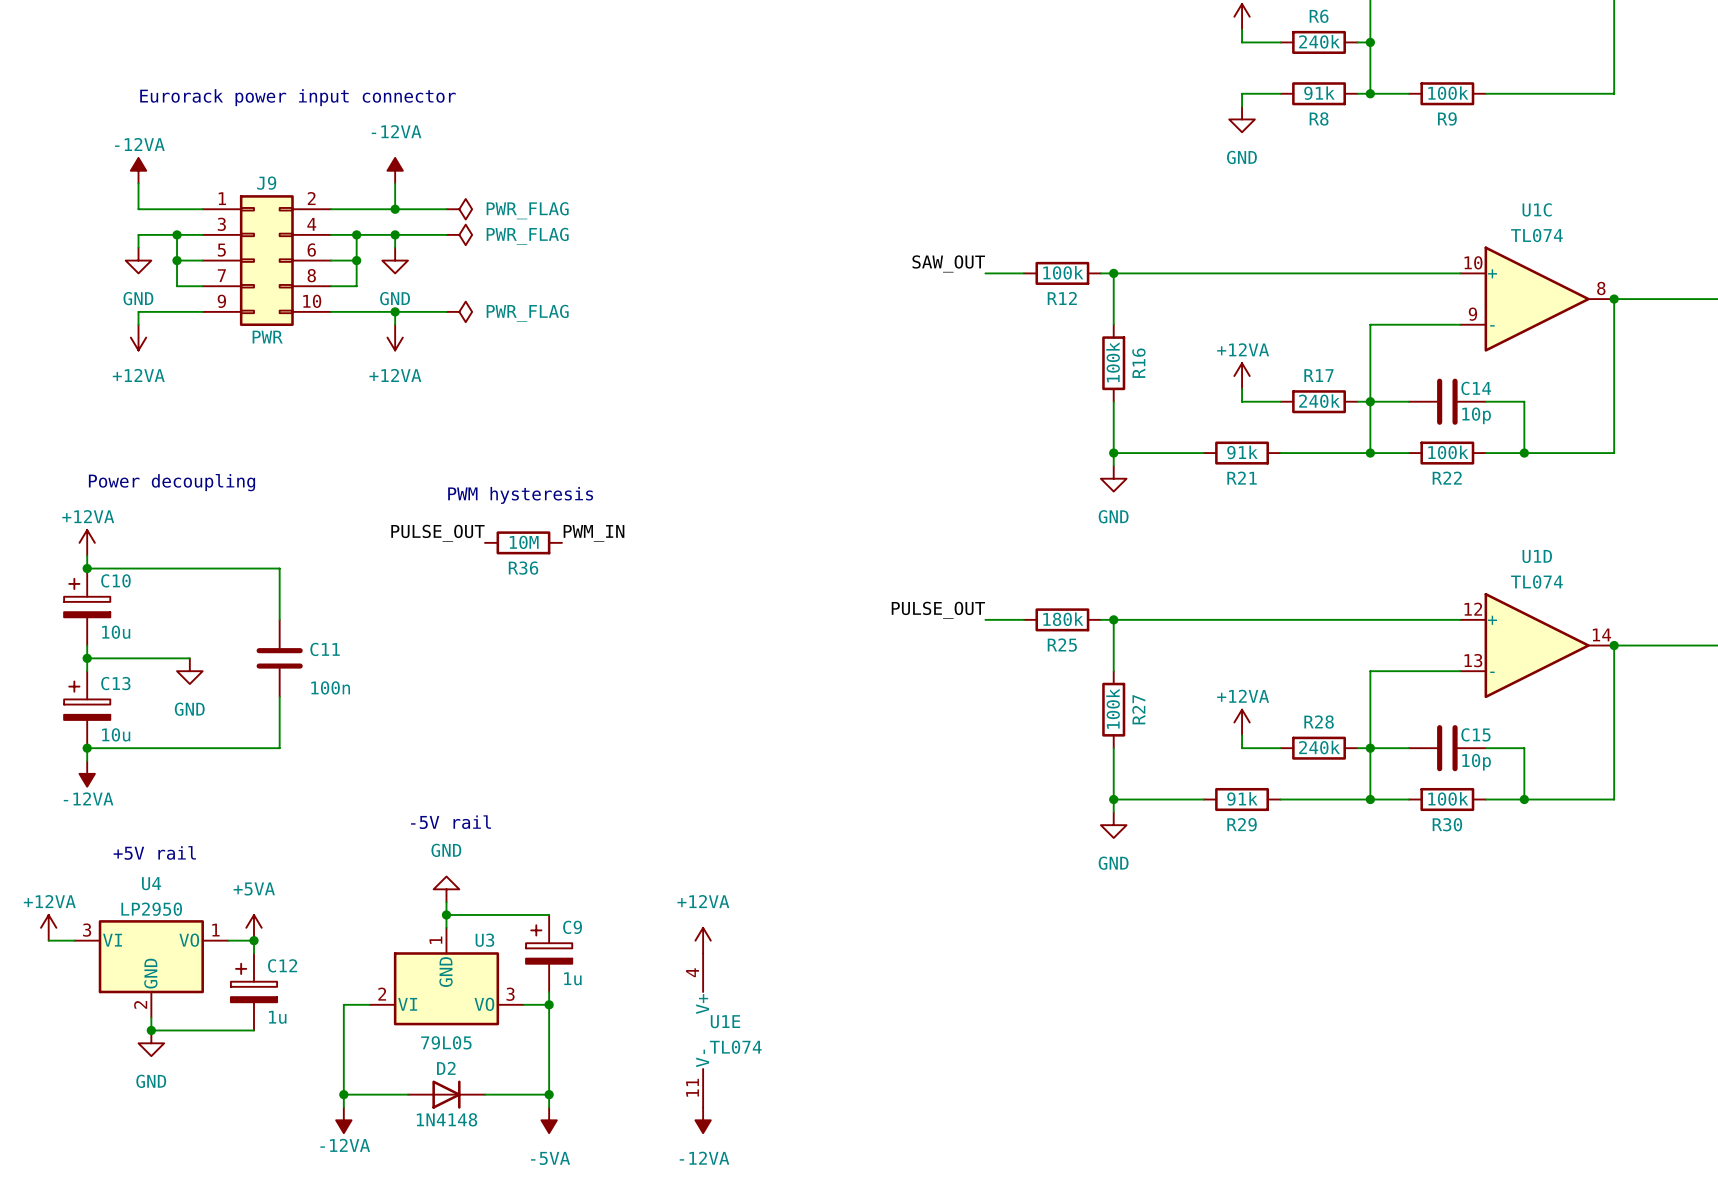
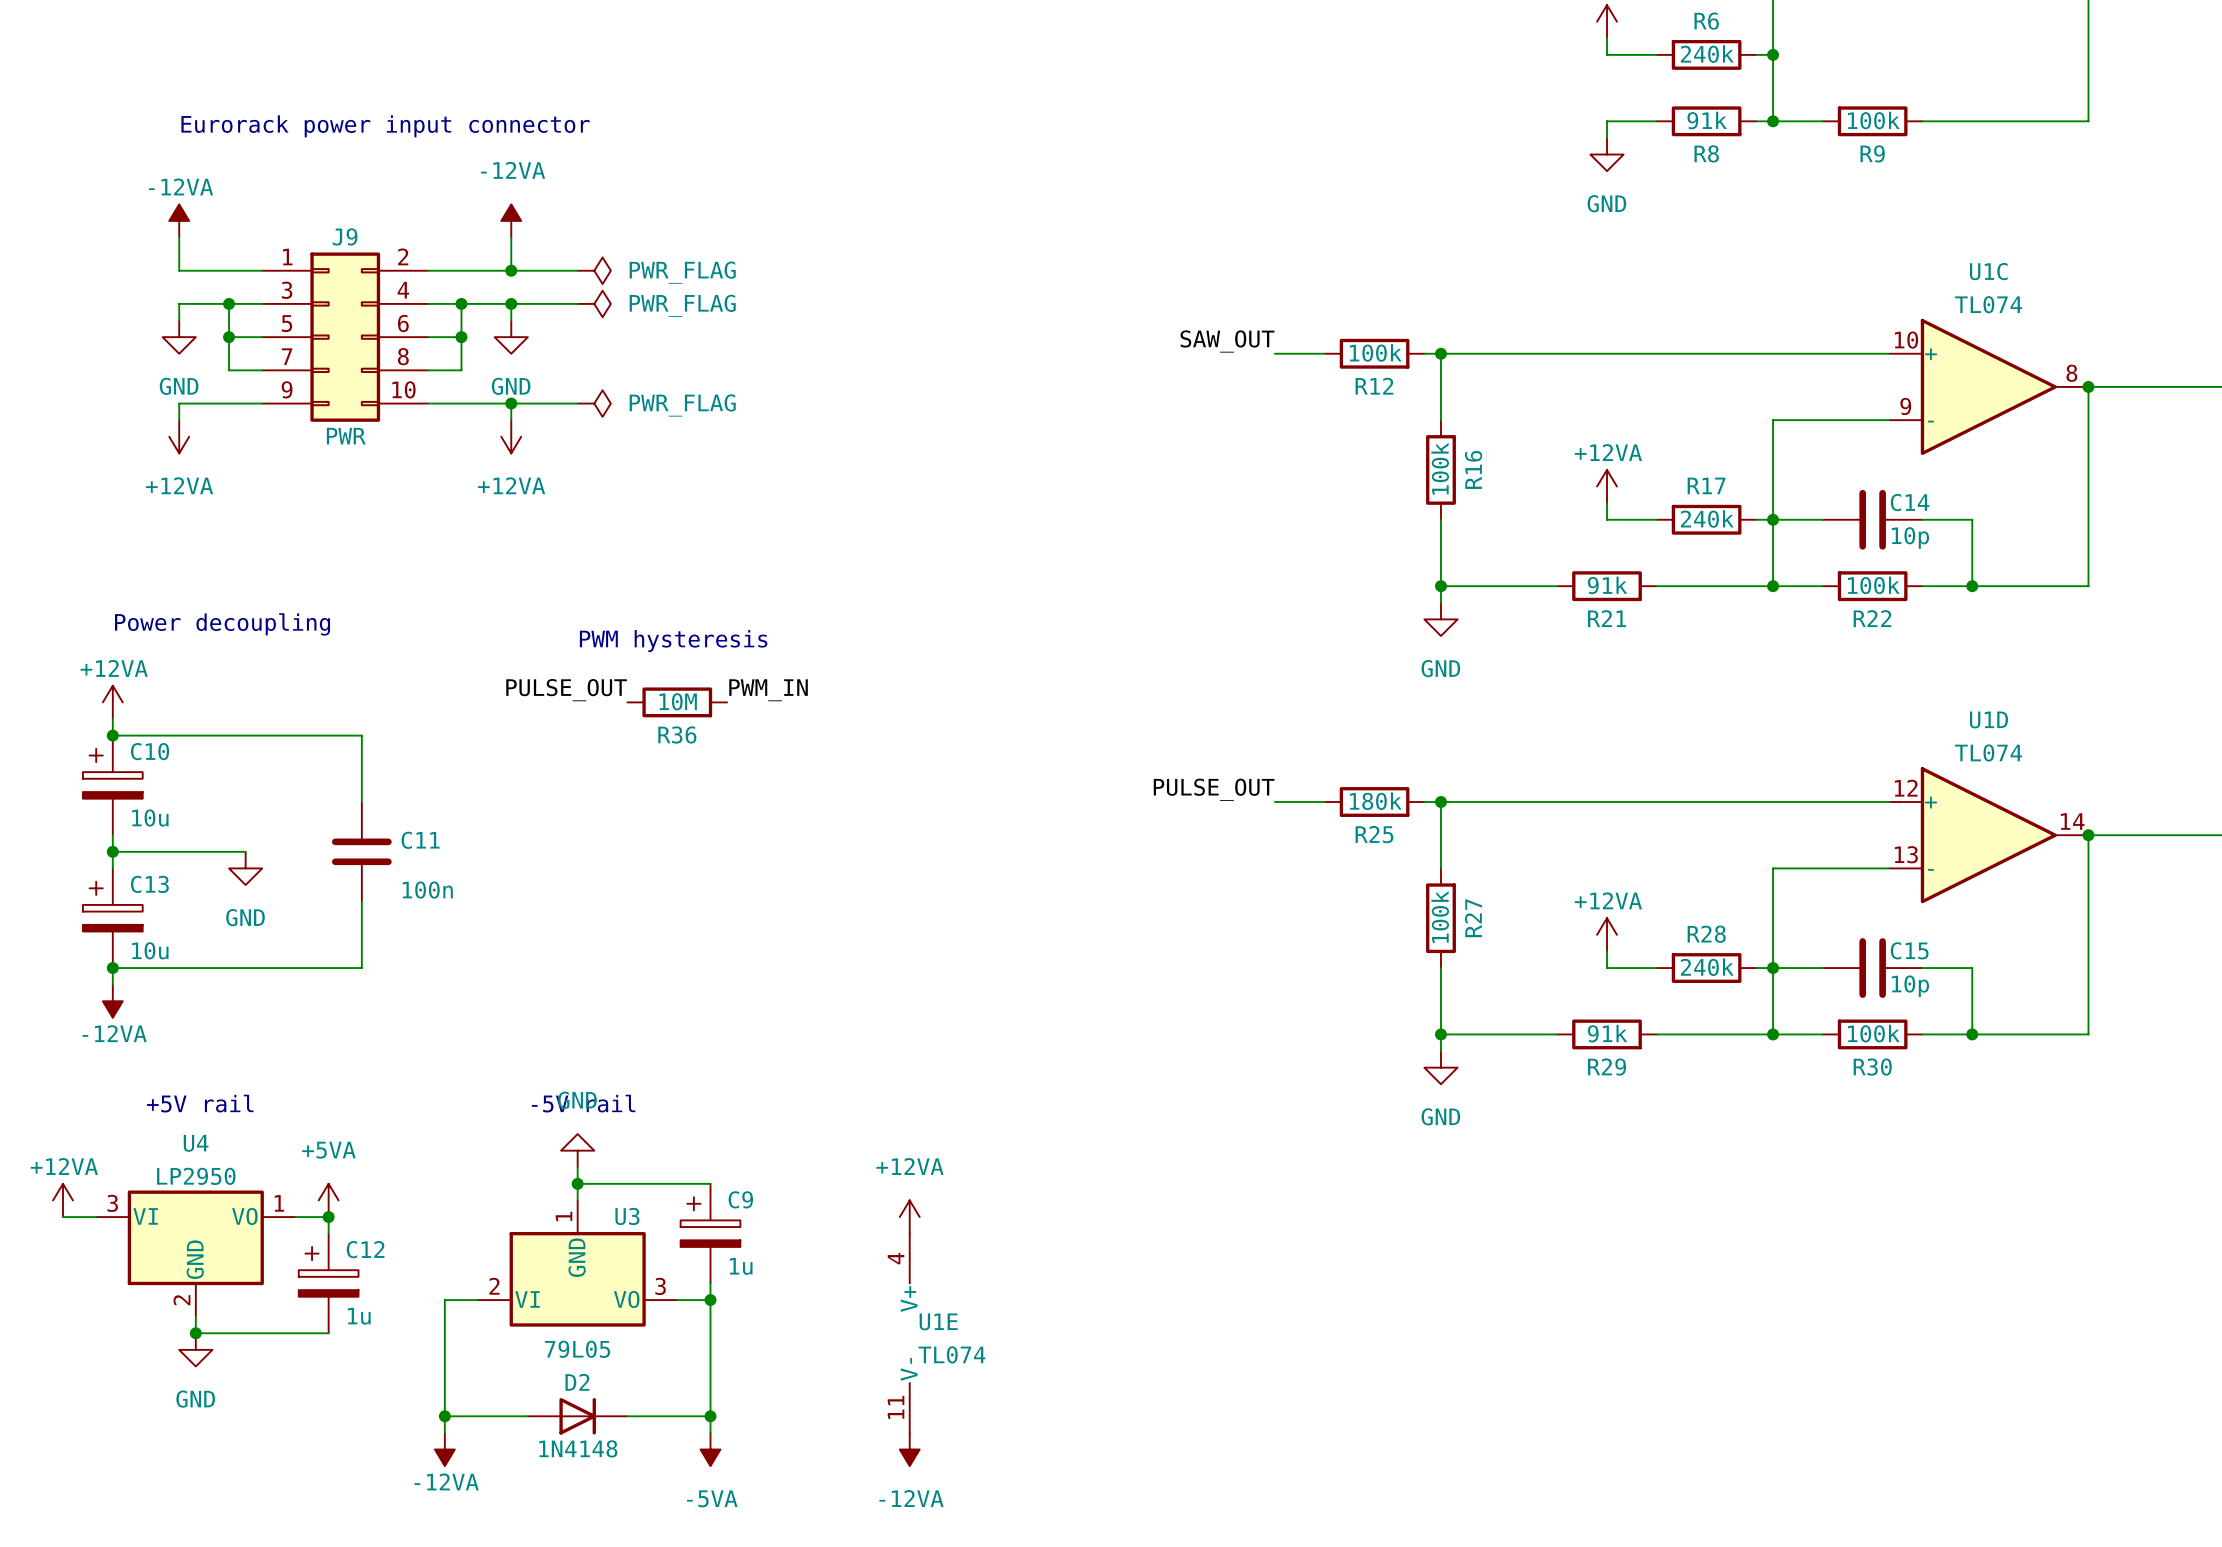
text position: -5V rail (451, 822) -> -5V rail (583, 1103)

